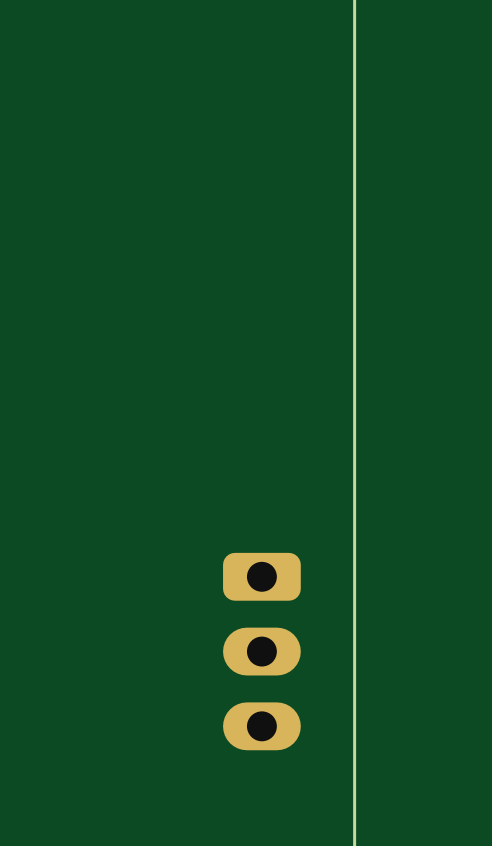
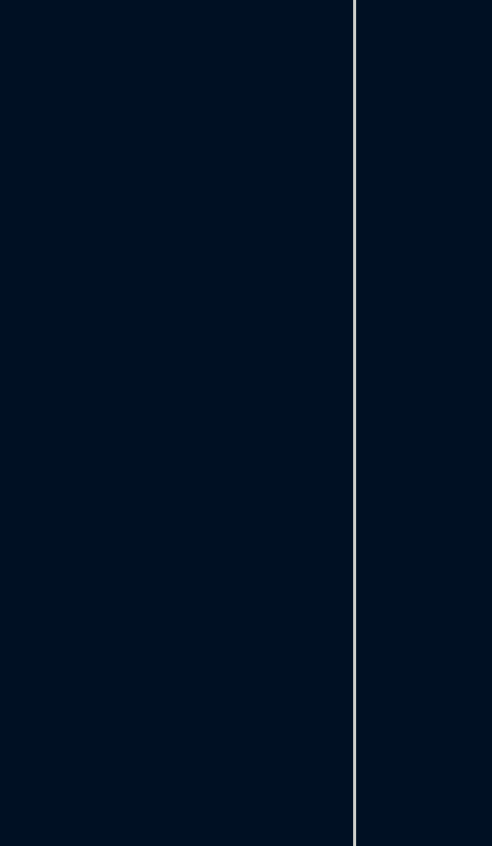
part: (261, 651) -> none

